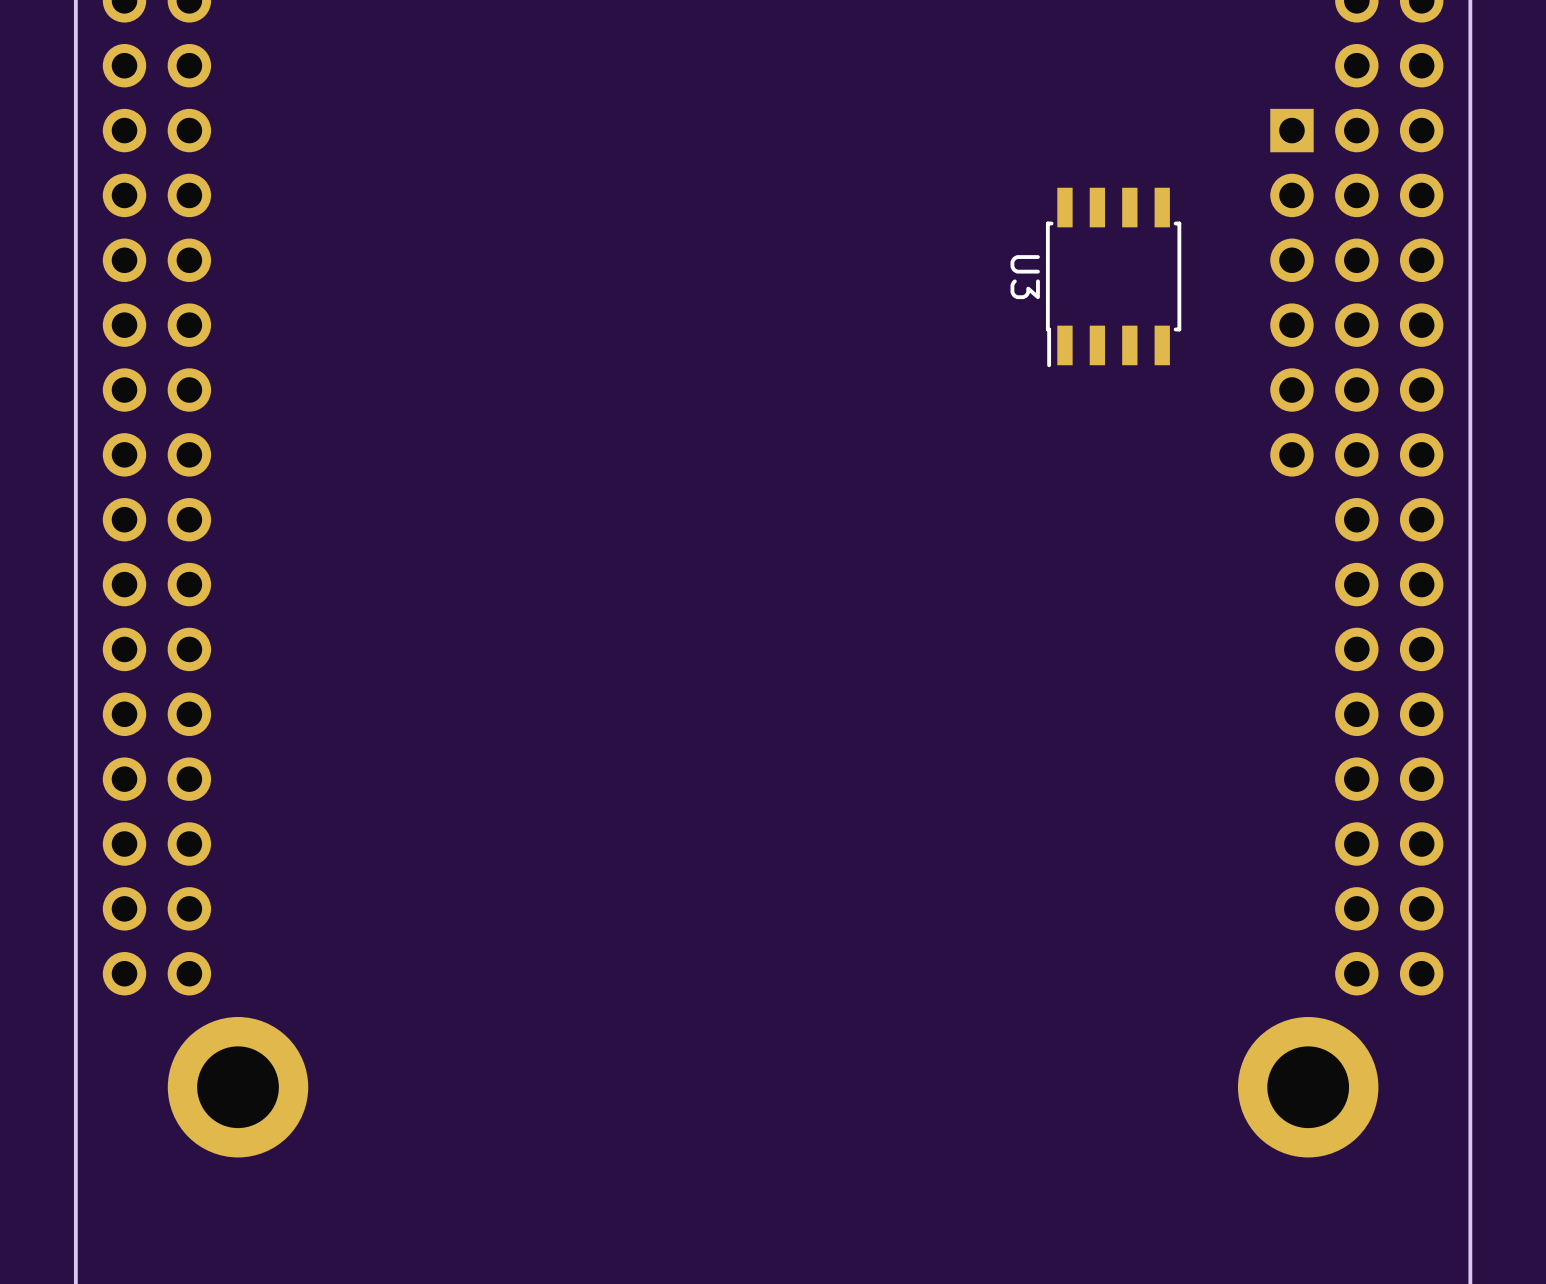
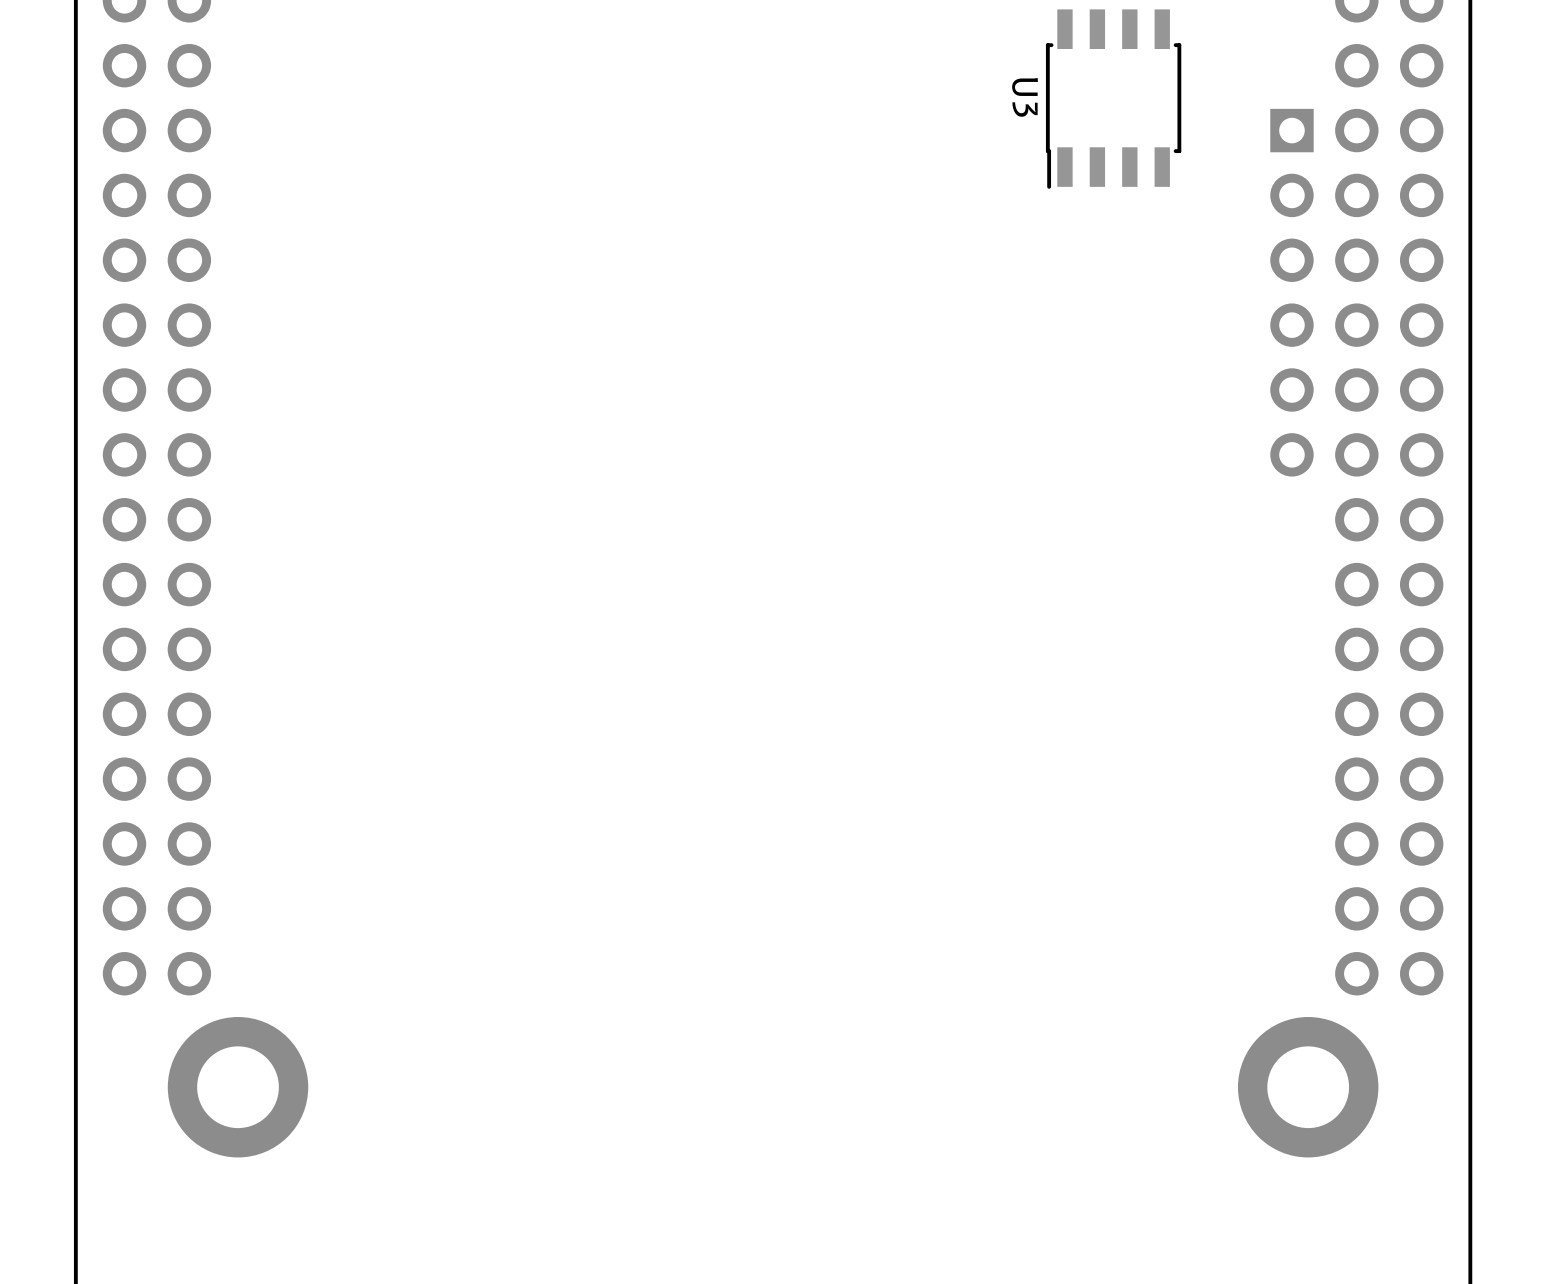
U3 position: (1113, 277) -> (1113, 99)

